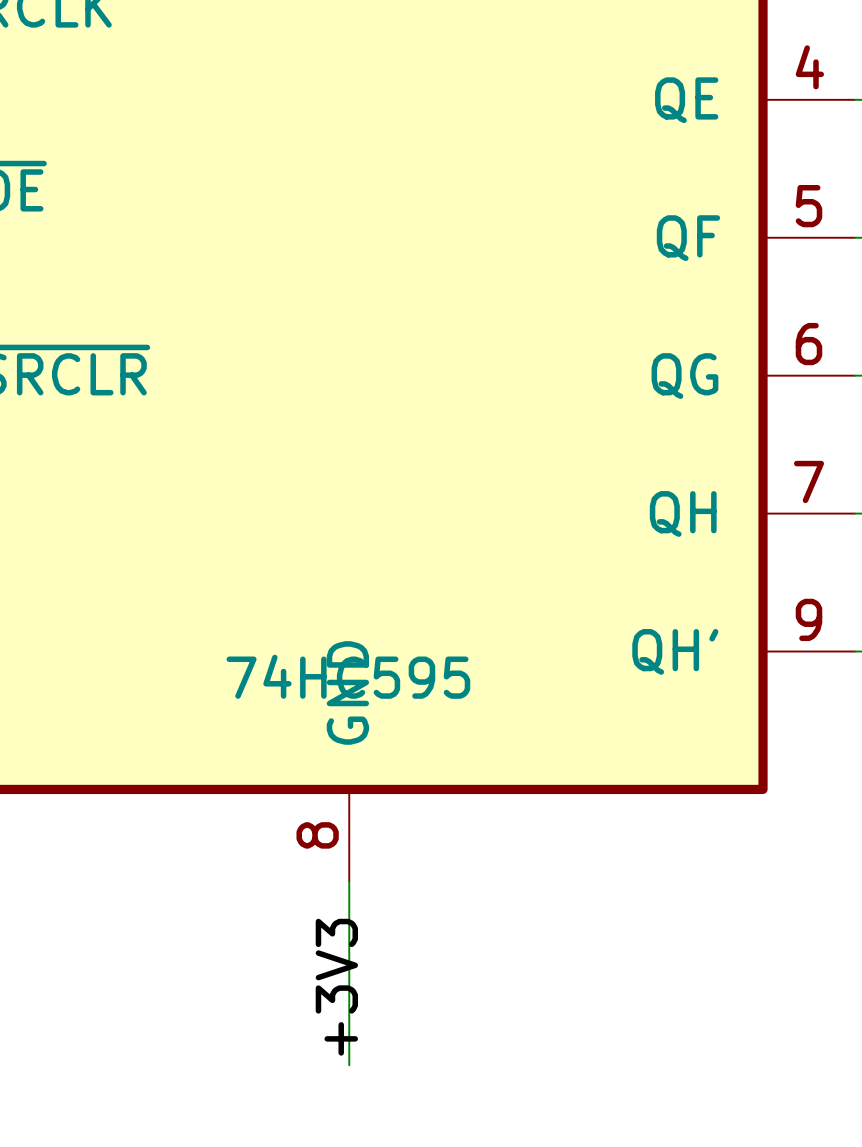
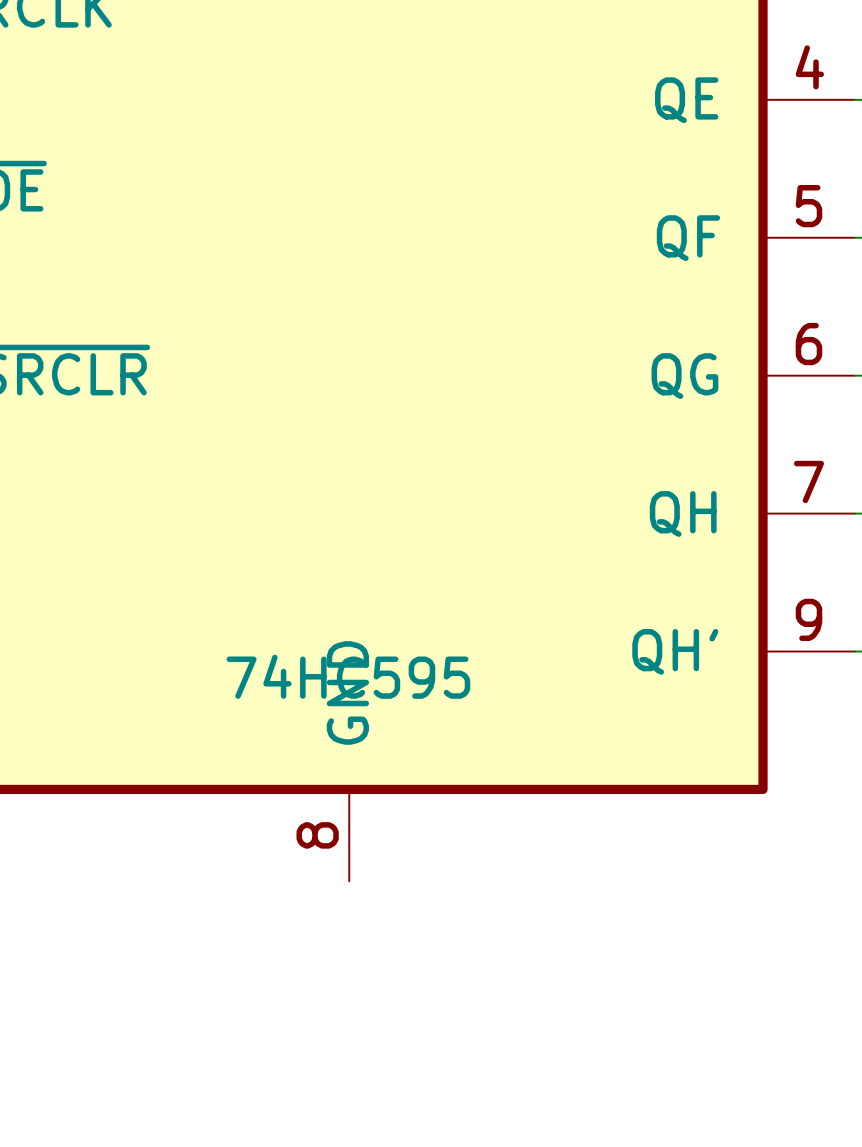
wire: (349, 881) (349, 1065) -> none
label: +3V3 (336, 987) -> none

